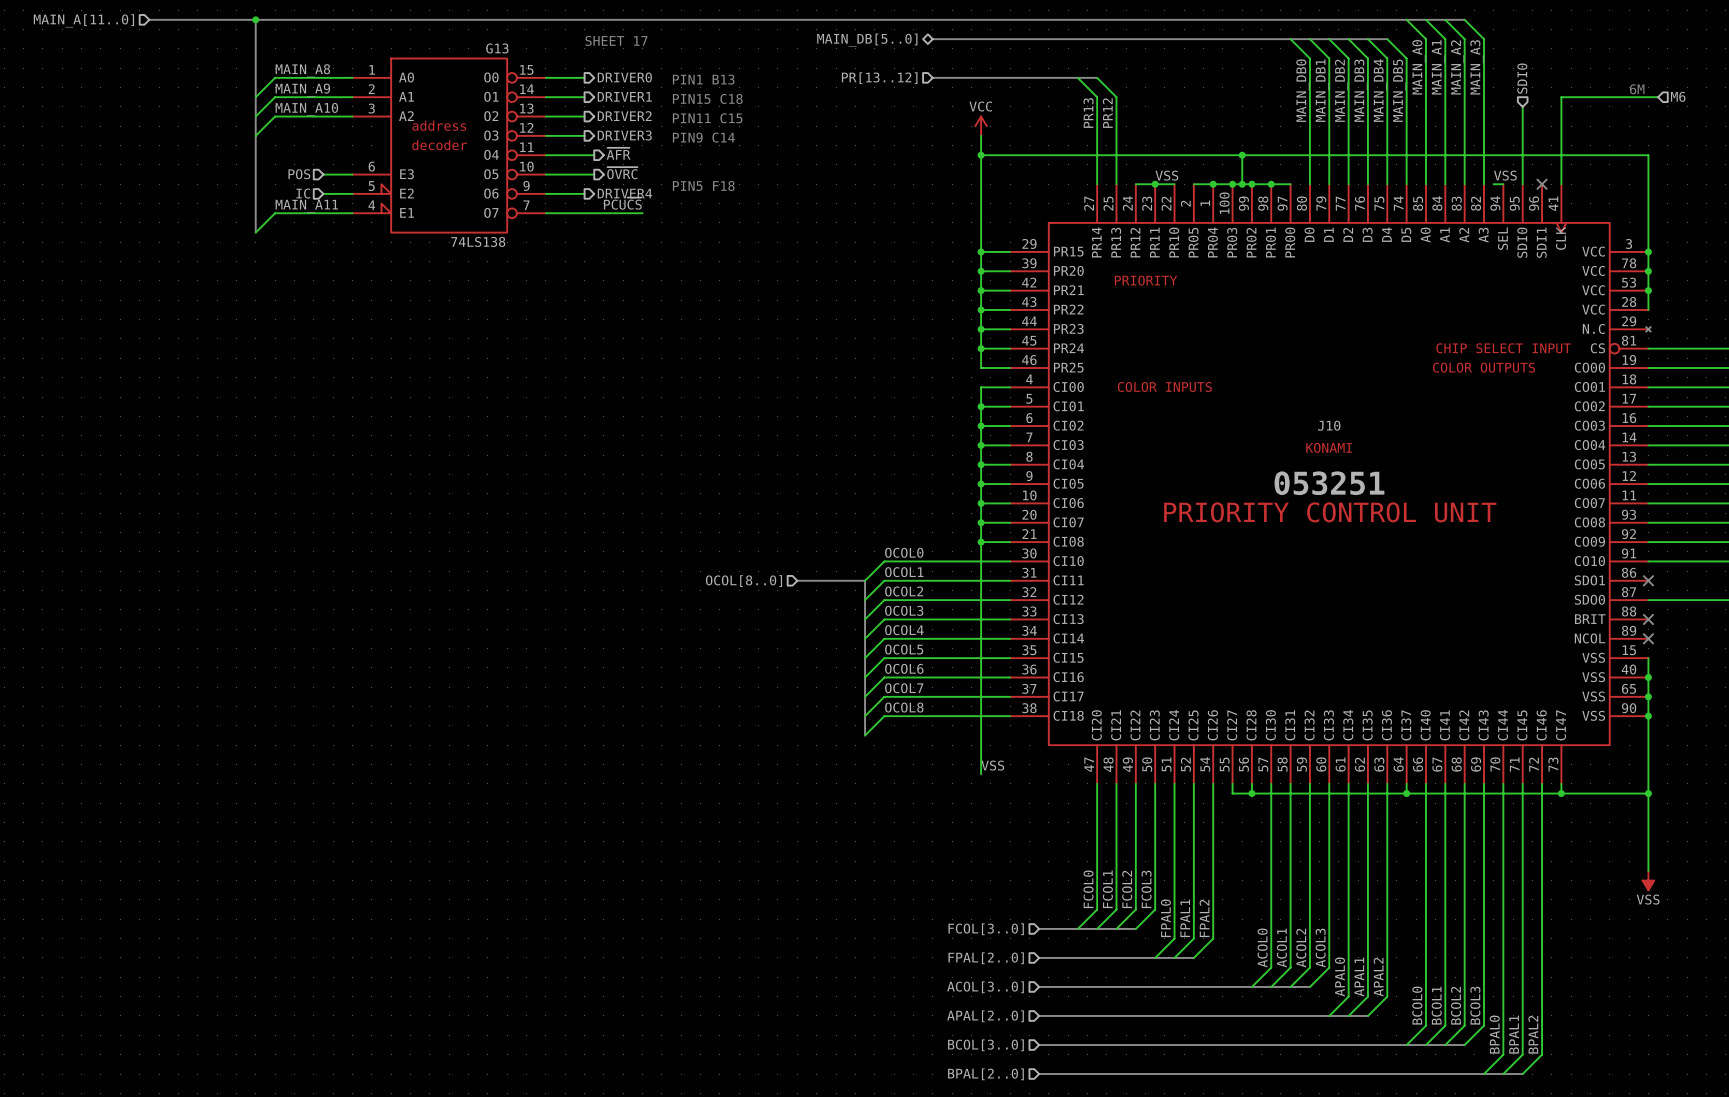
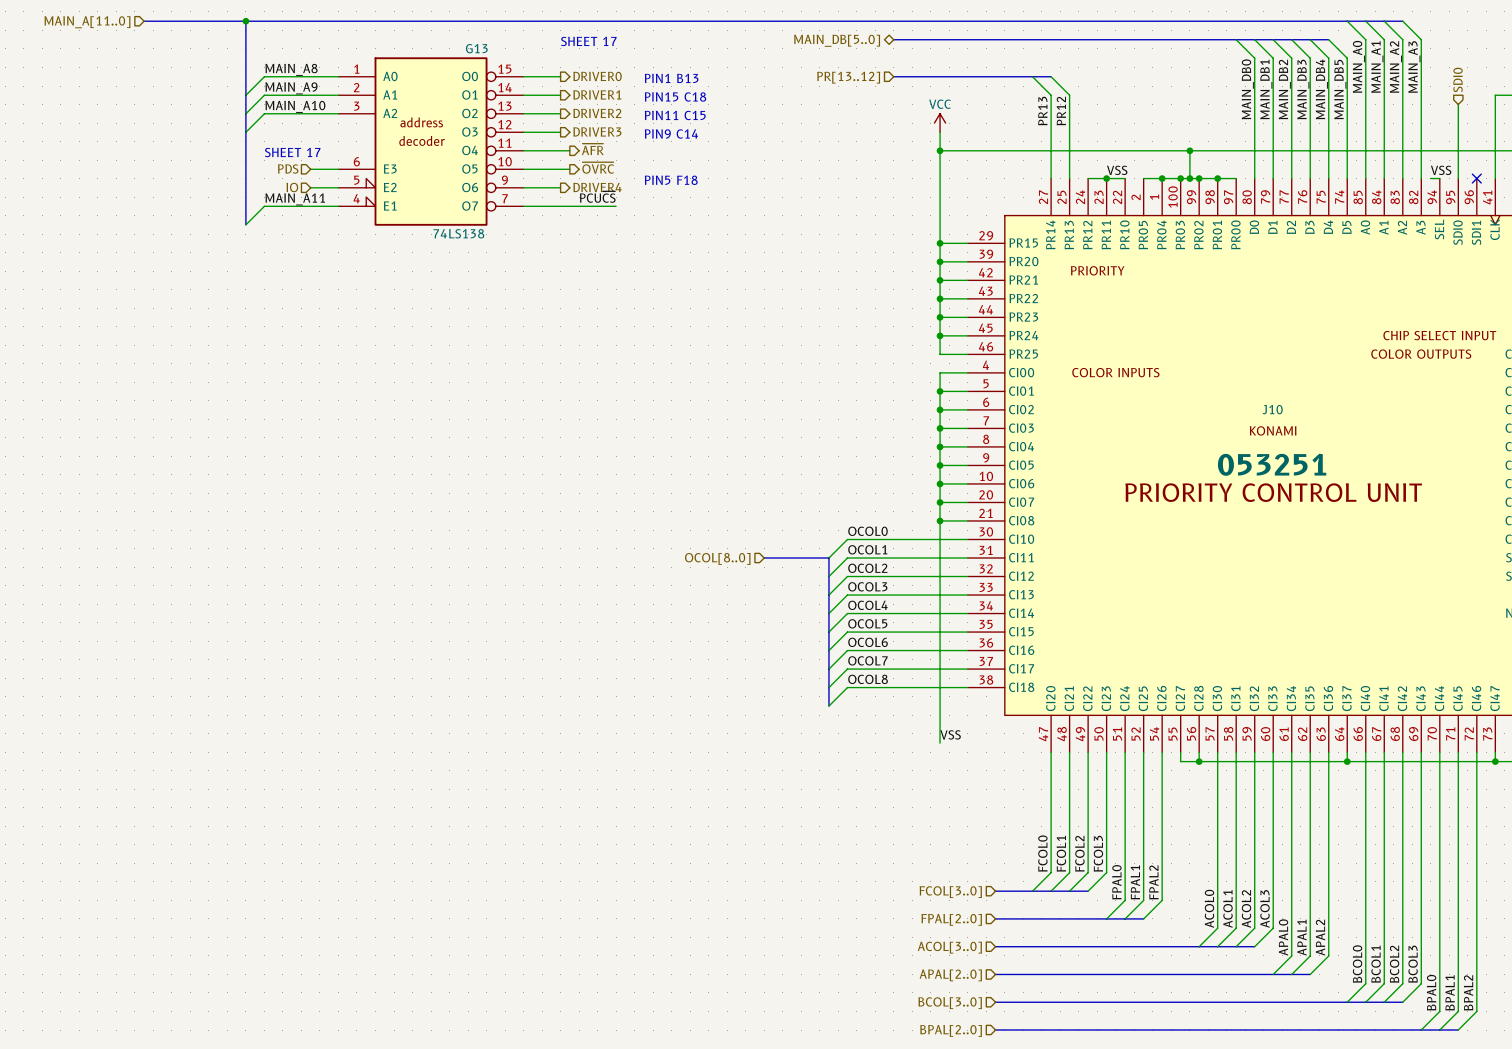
text: none -> SHEET 17 (292, 152)
hierarchical label: POS (299, 174) -> PDS (288, 169)
hierarchical label: IC (303, 193) -> IO (292, 187)

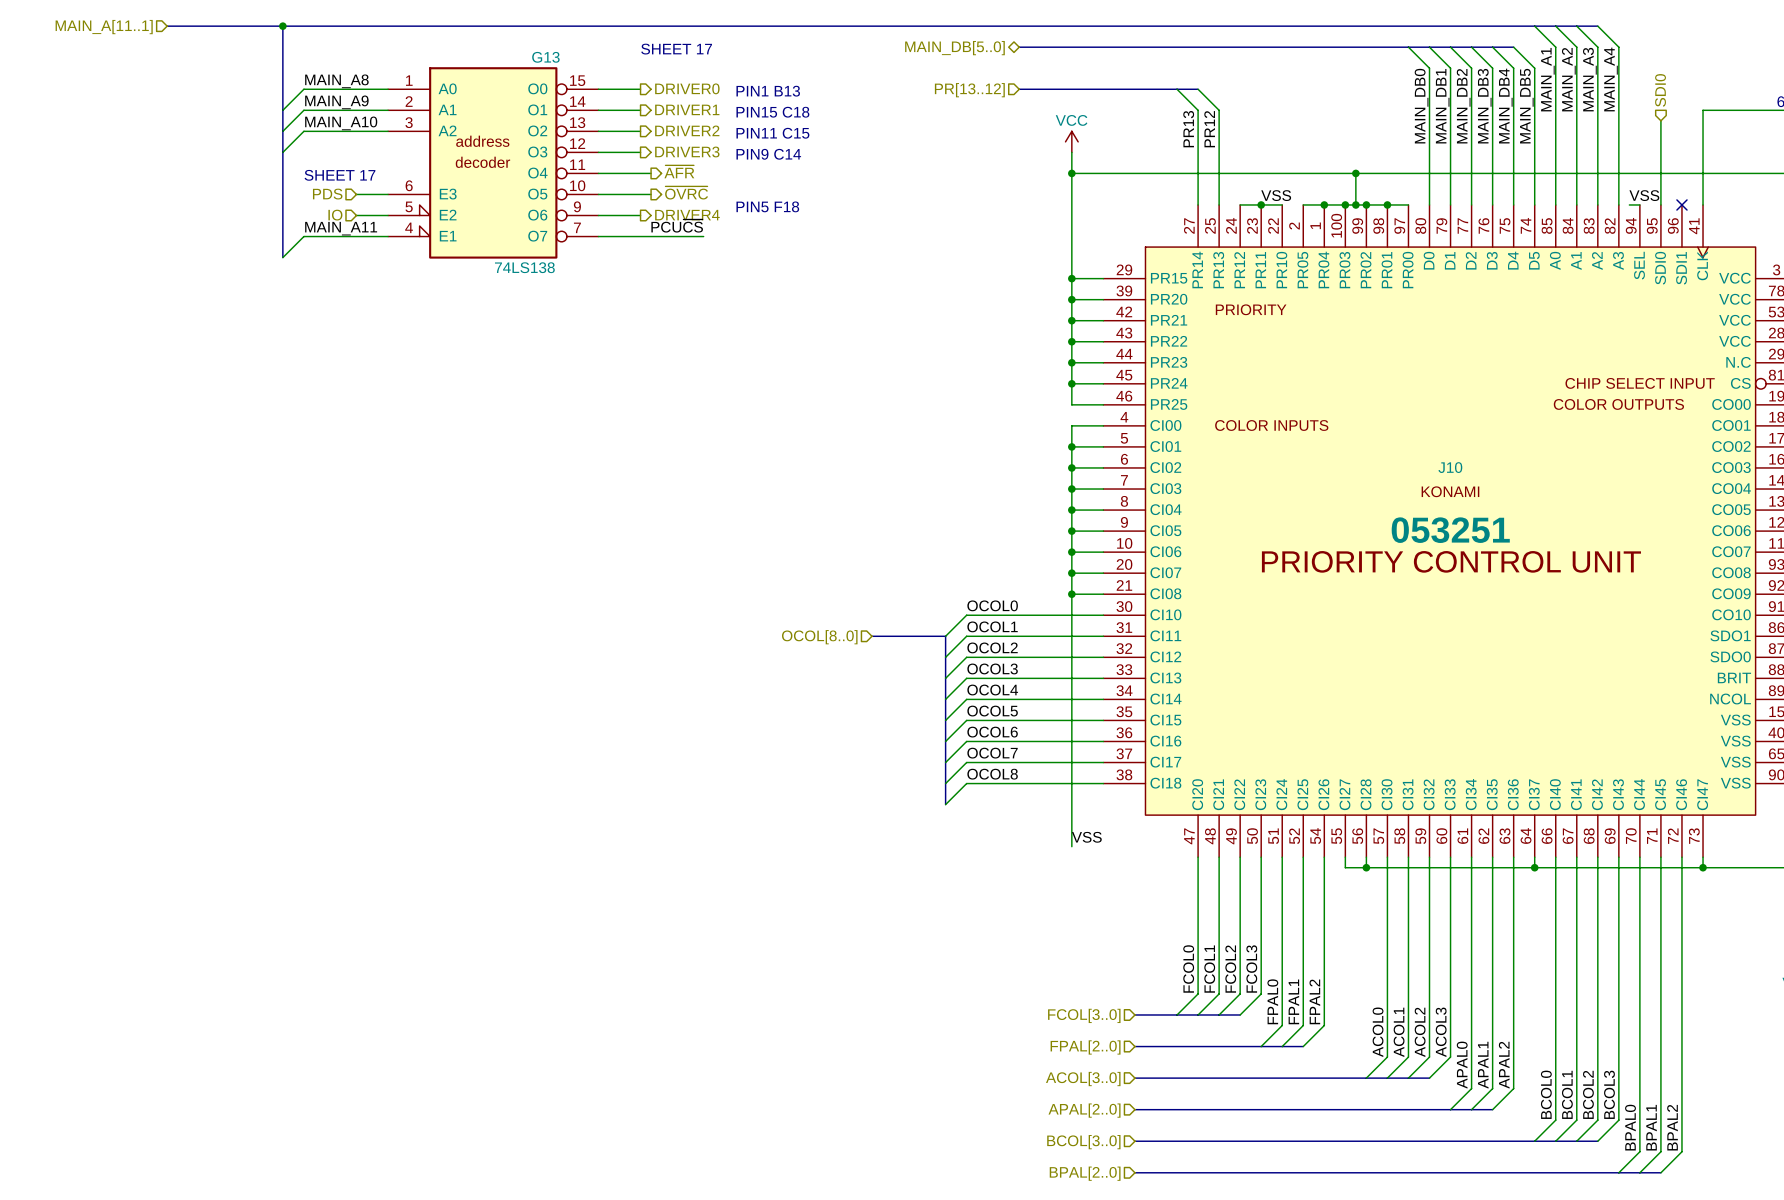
hierarchical label: MAIN_A[11..0] (87, 22) -> MAIN_A[11..1] (104, 27)
label: MAIN_A0 (1358, 66) -> MAIN_A1 (1547, 79)
label: MAIN_A1 (1377, 67) -> MAIN_A2 (1568, 79)
label: MAIN_A2 (1395, 67) -> MAIN_A3 (1589, 79)
label: MAIN_A3 (1414, 67) -> MAIN_A4 (1610, 79)

